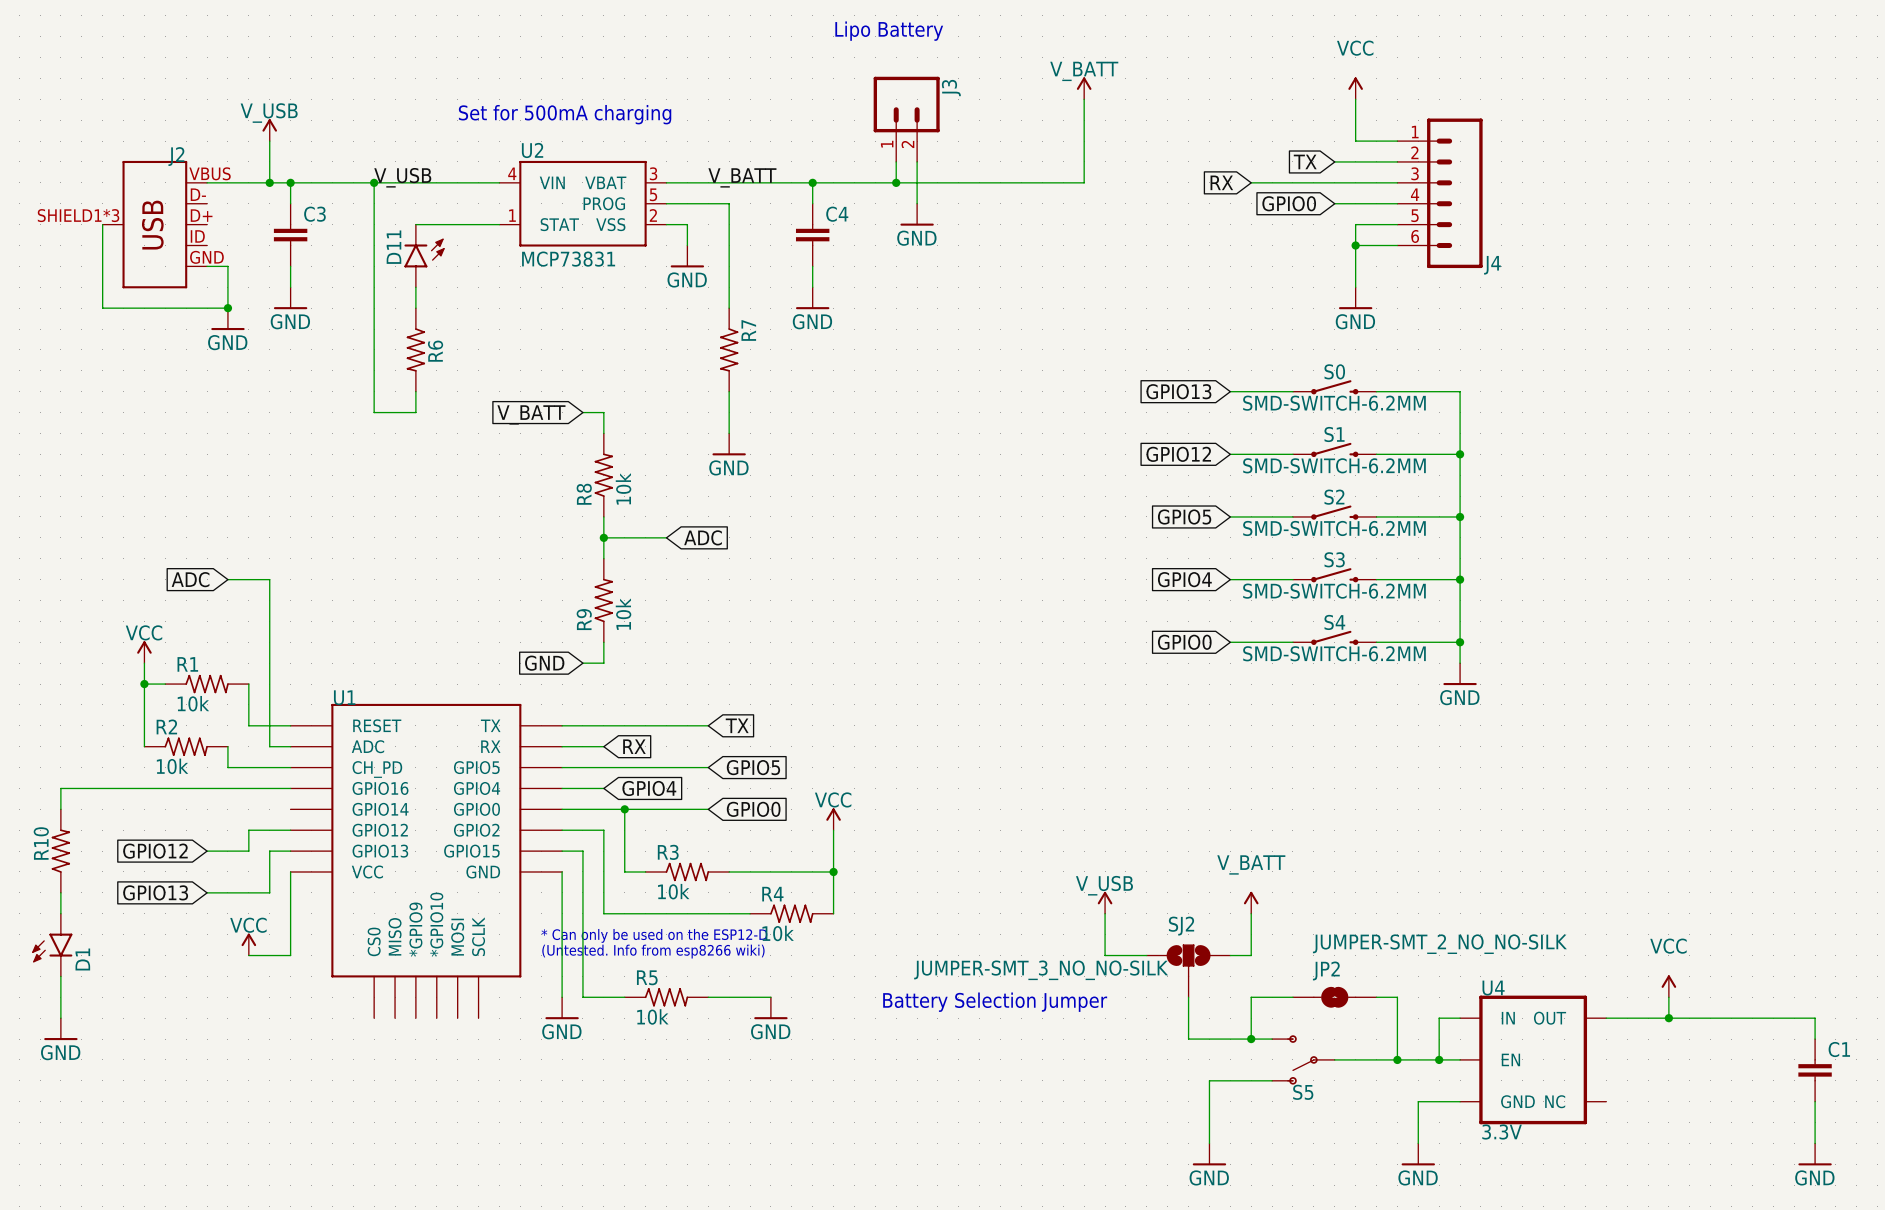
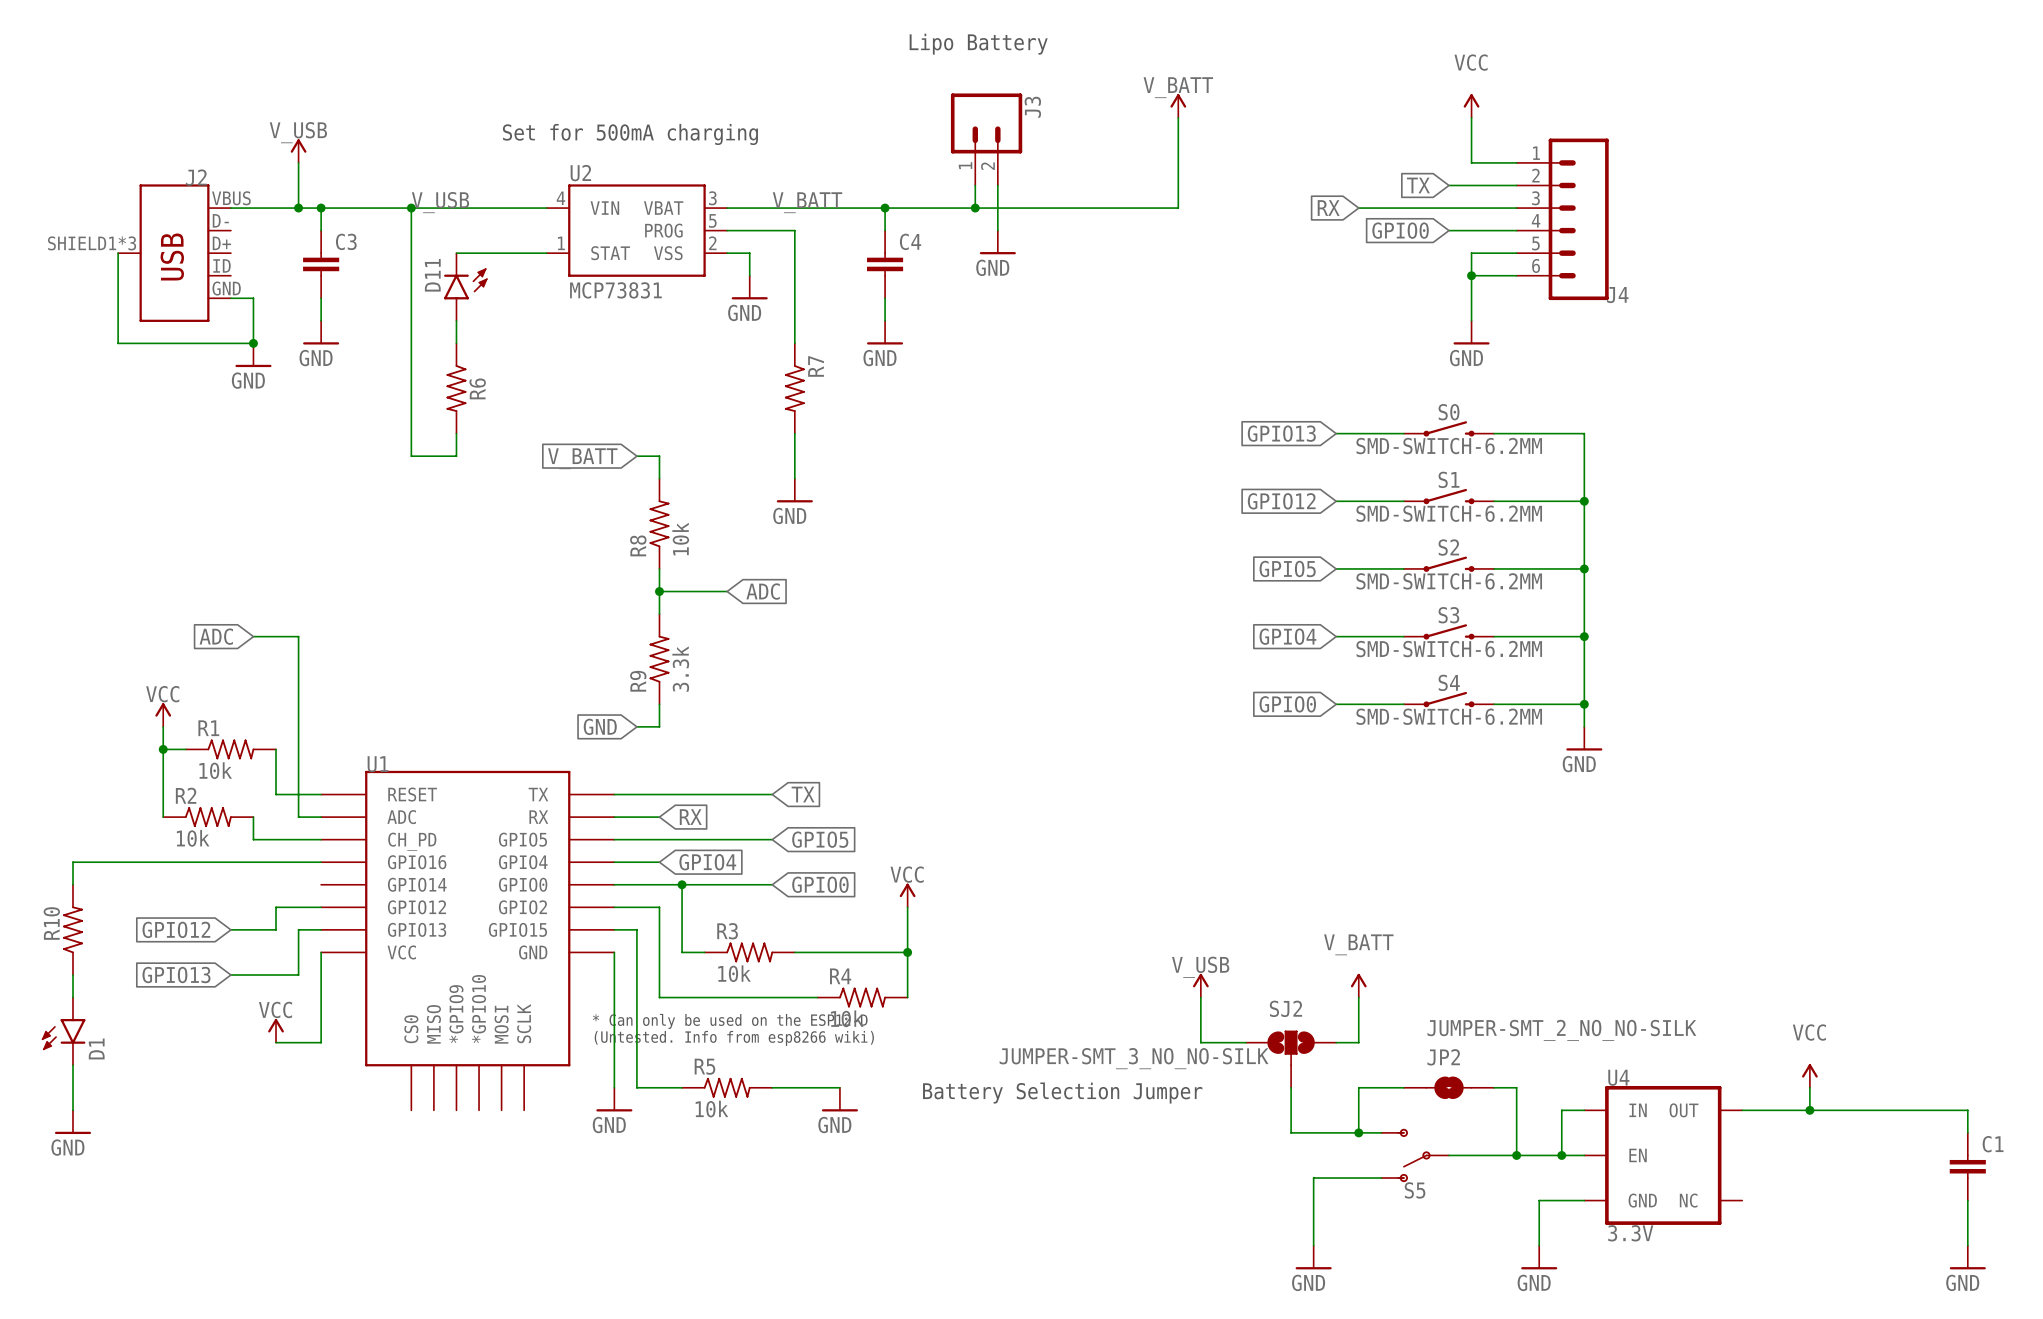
R9 value: 10k (623, 614) -> 3.3k (680, 669)

